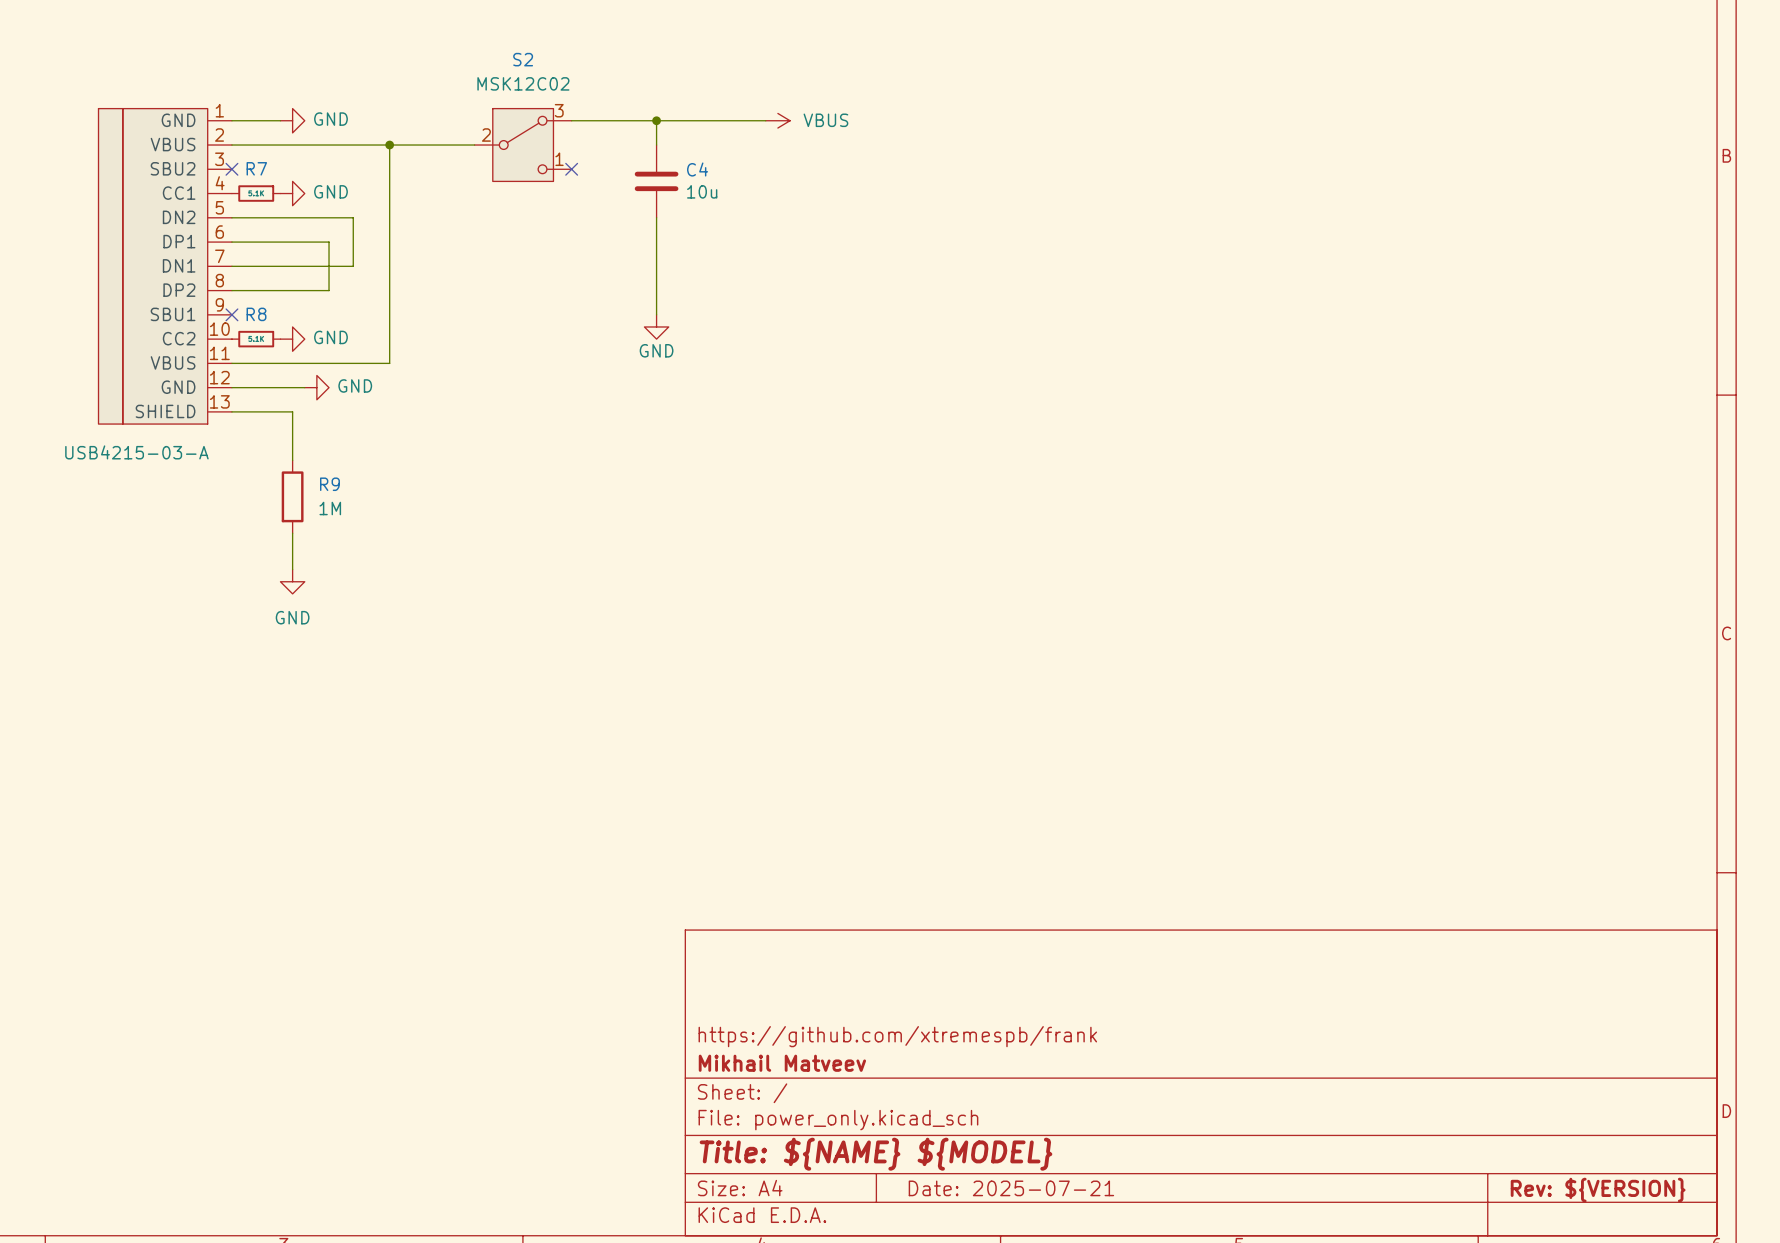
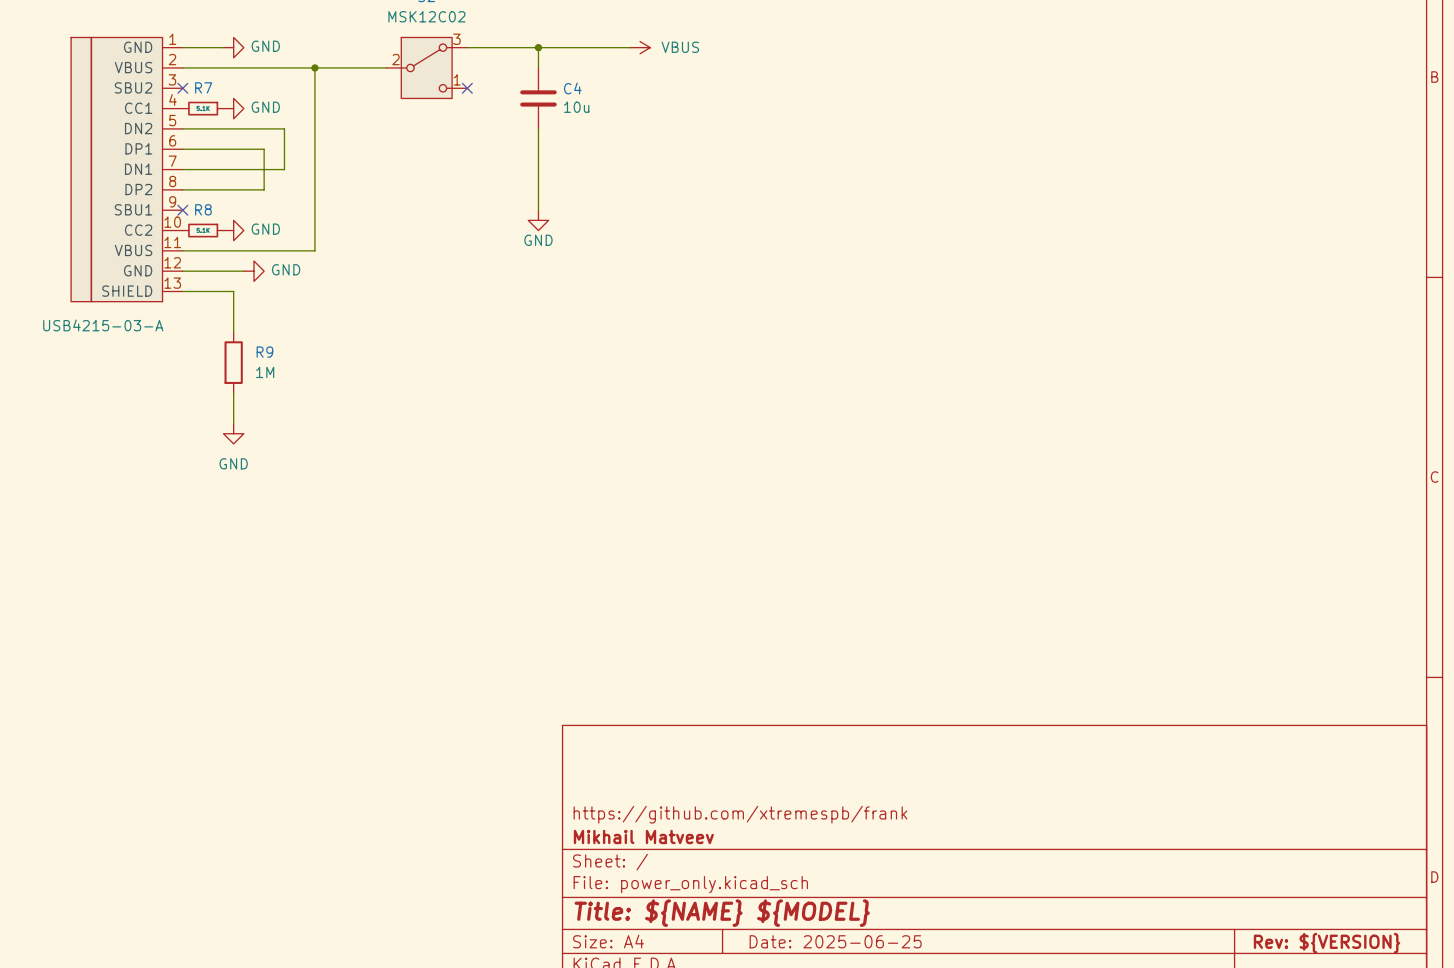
title block: Date: 2025-07-21 (1011, 1188) -> Date: 2025-06-25 (835, 941)

